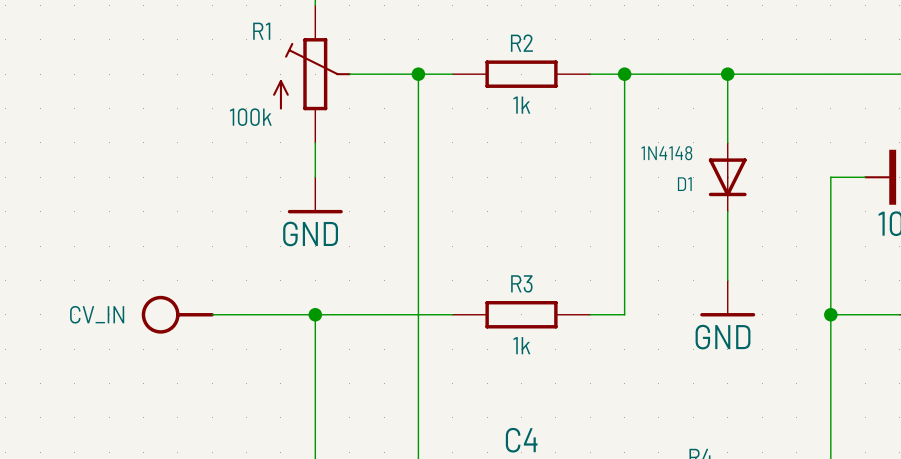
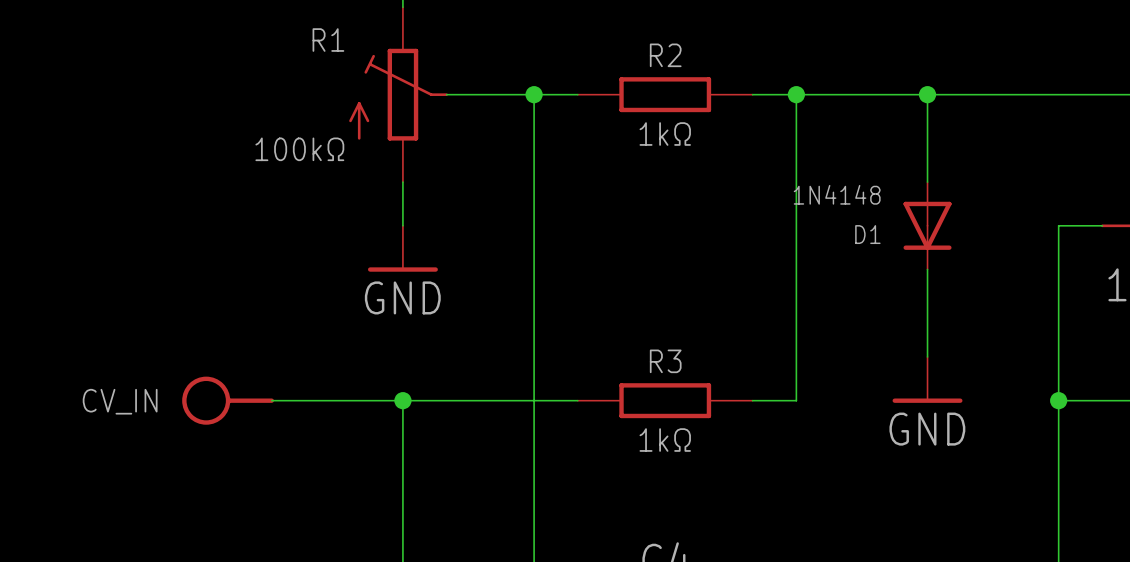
R2 value: 1k (521, 105) -> 1kΩ (665, 134)
R1 value: 100k (250, 117) -> 100kΩ (299, 149)
R3 value: 1k (521, 345) -> 1kΩ (665, 440)

